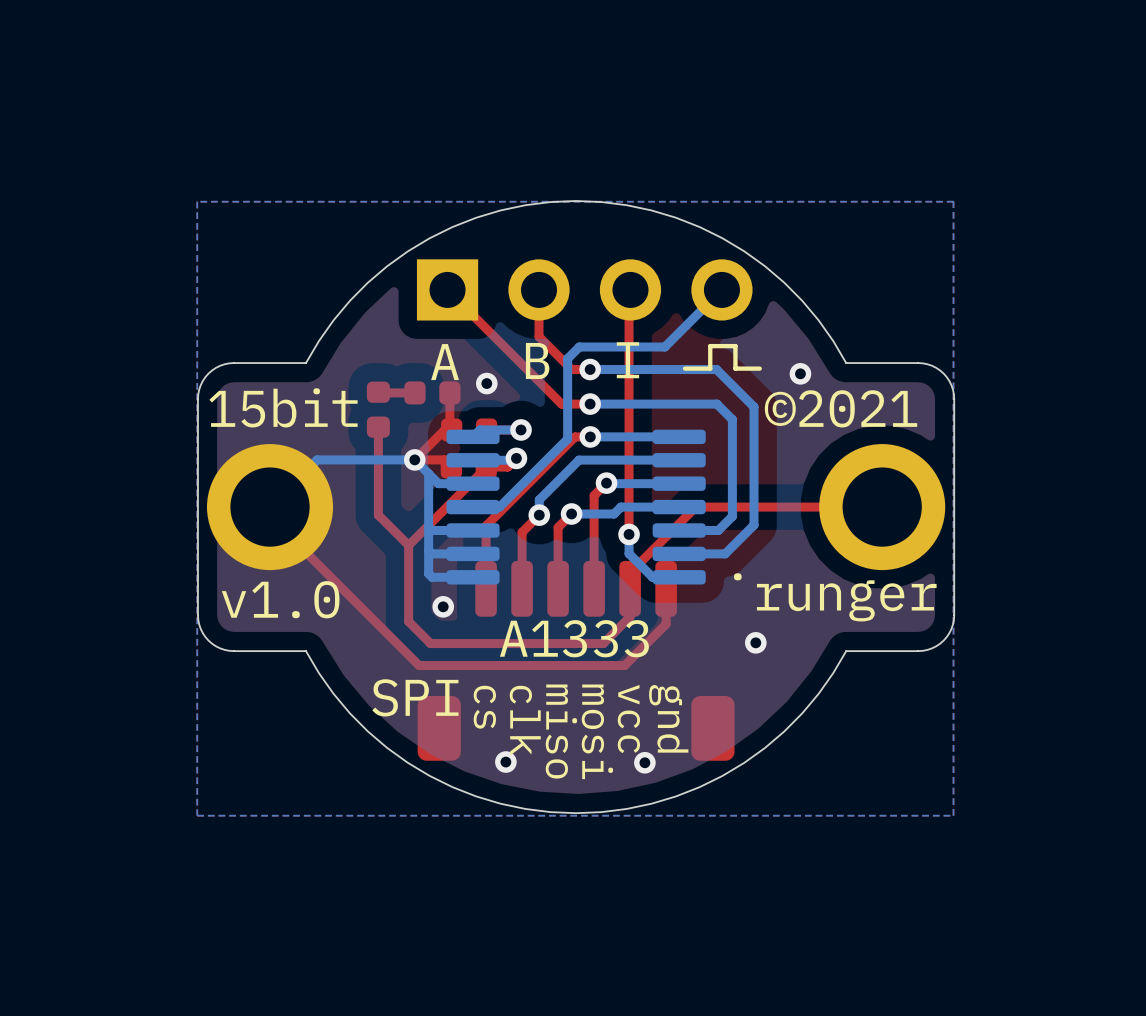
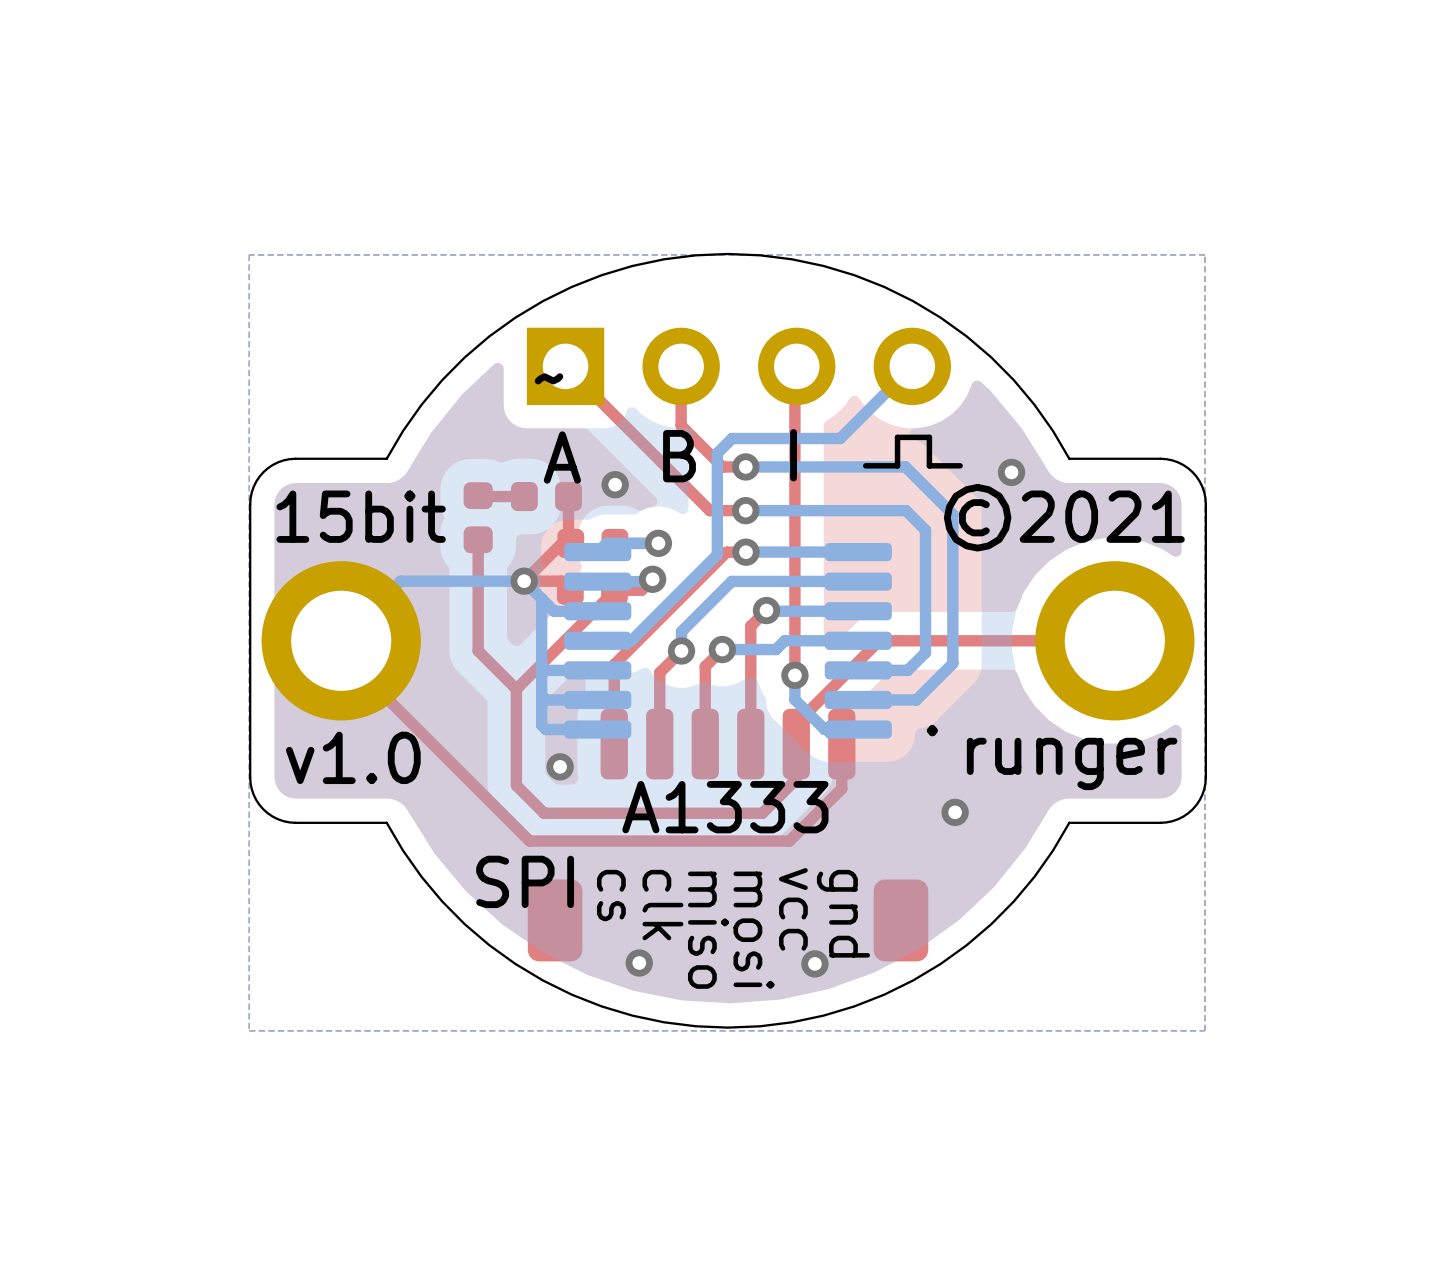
text: none -> ~ (549, 378)

